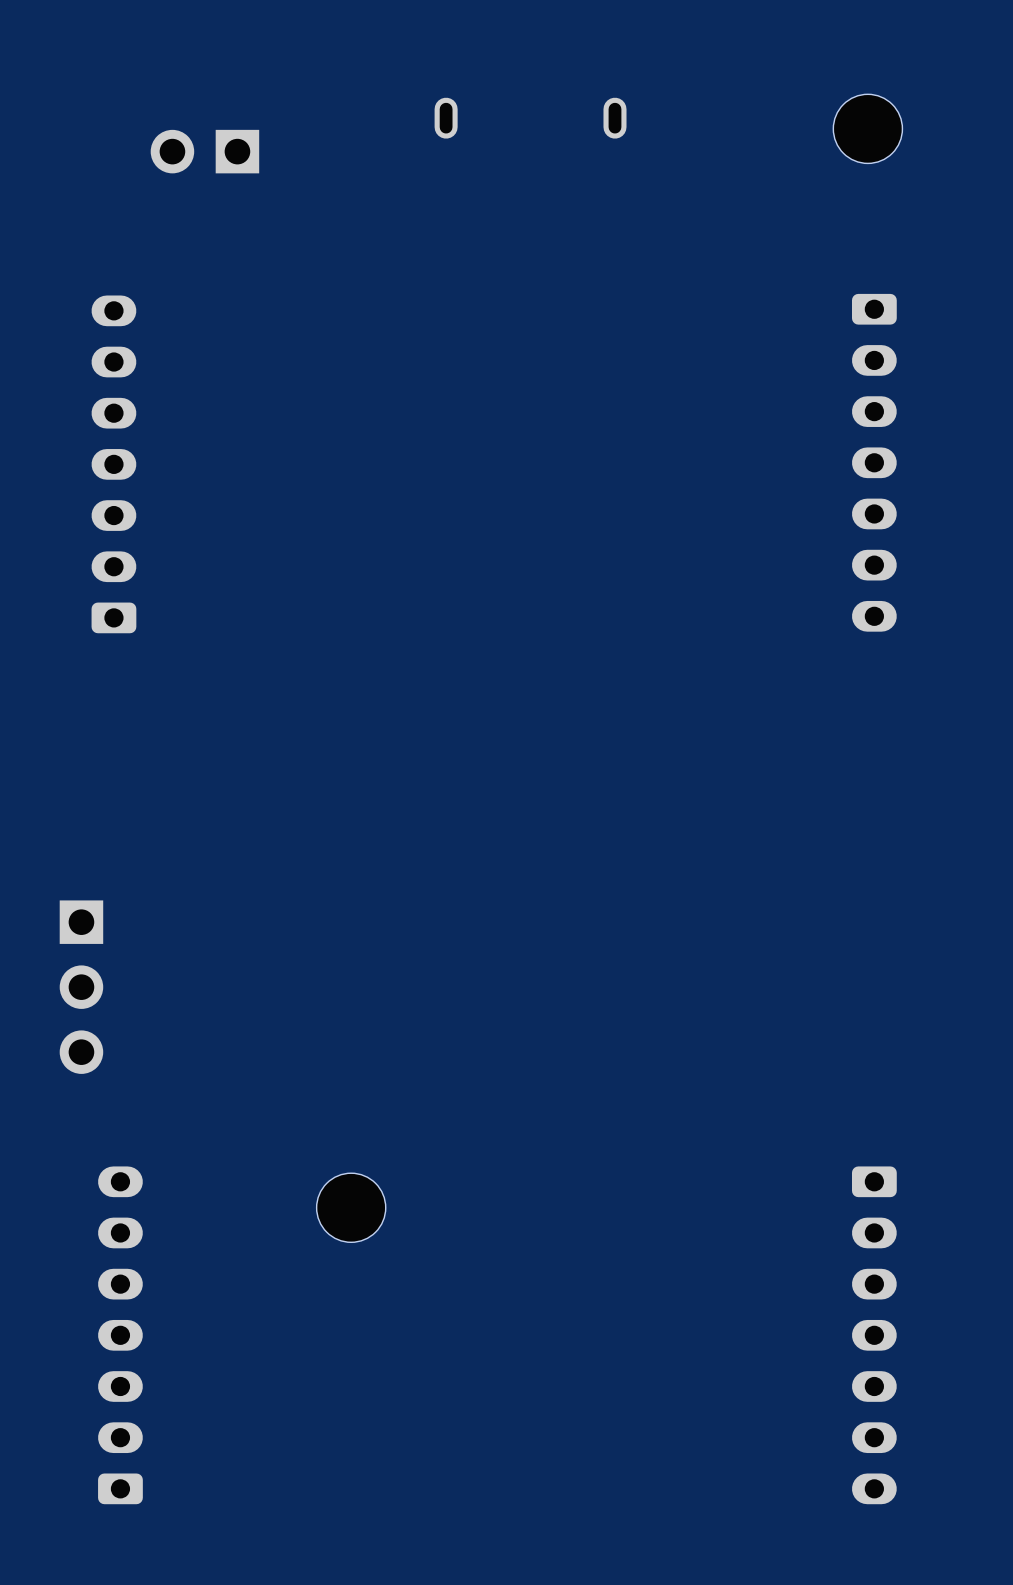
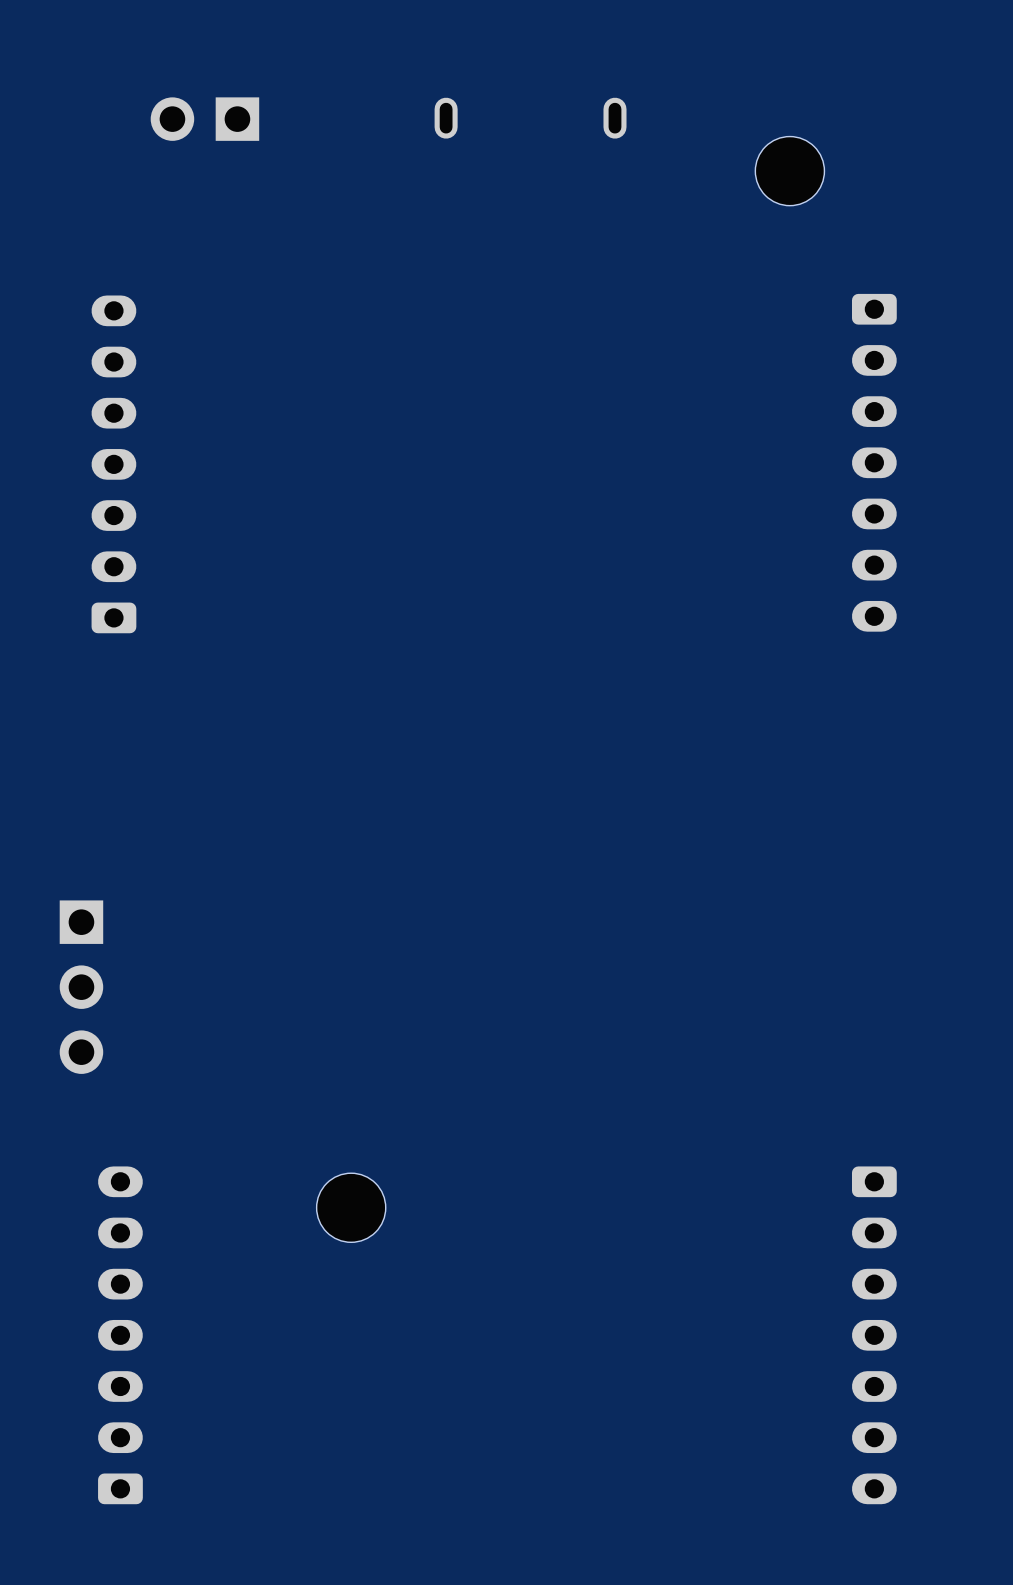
part position: (867, 128) -> (789, 171)
part position: (204, 151) -> (204, 119)

